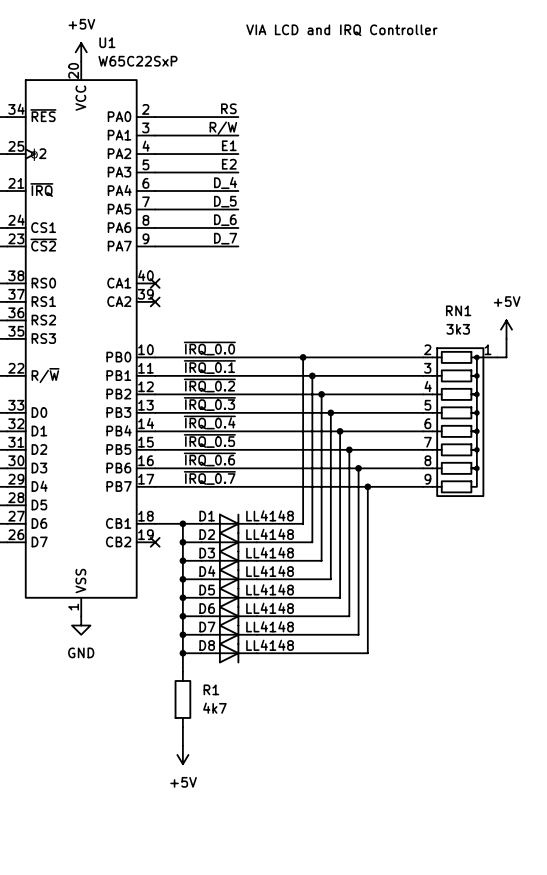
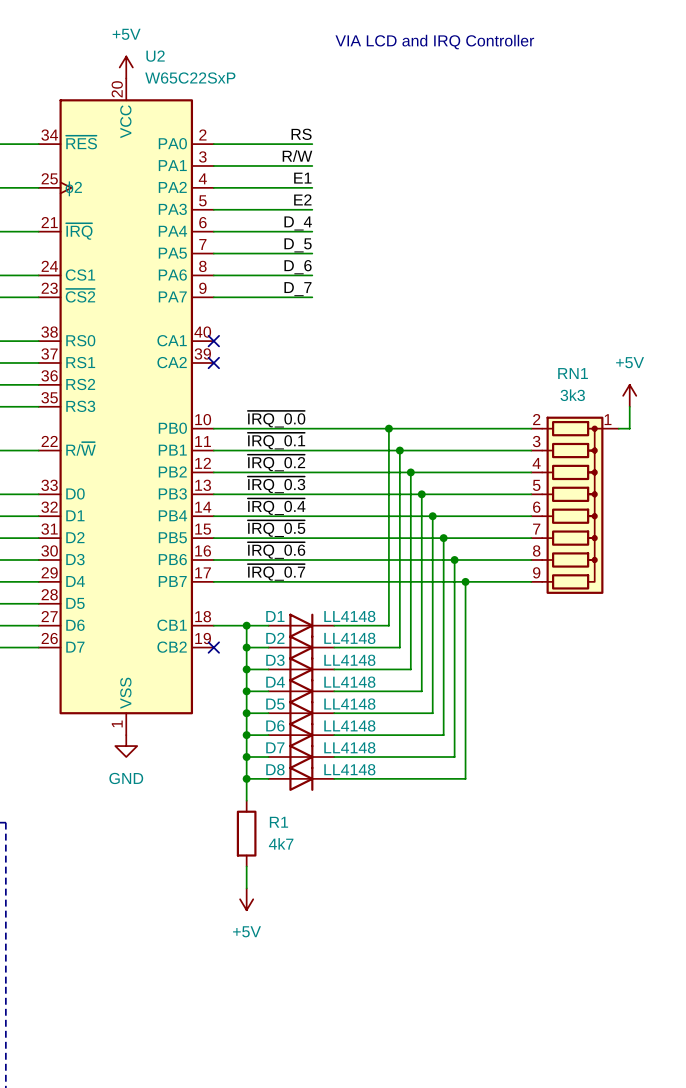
U1 name: U1 (107, 42) -> U2 (155, 56)

